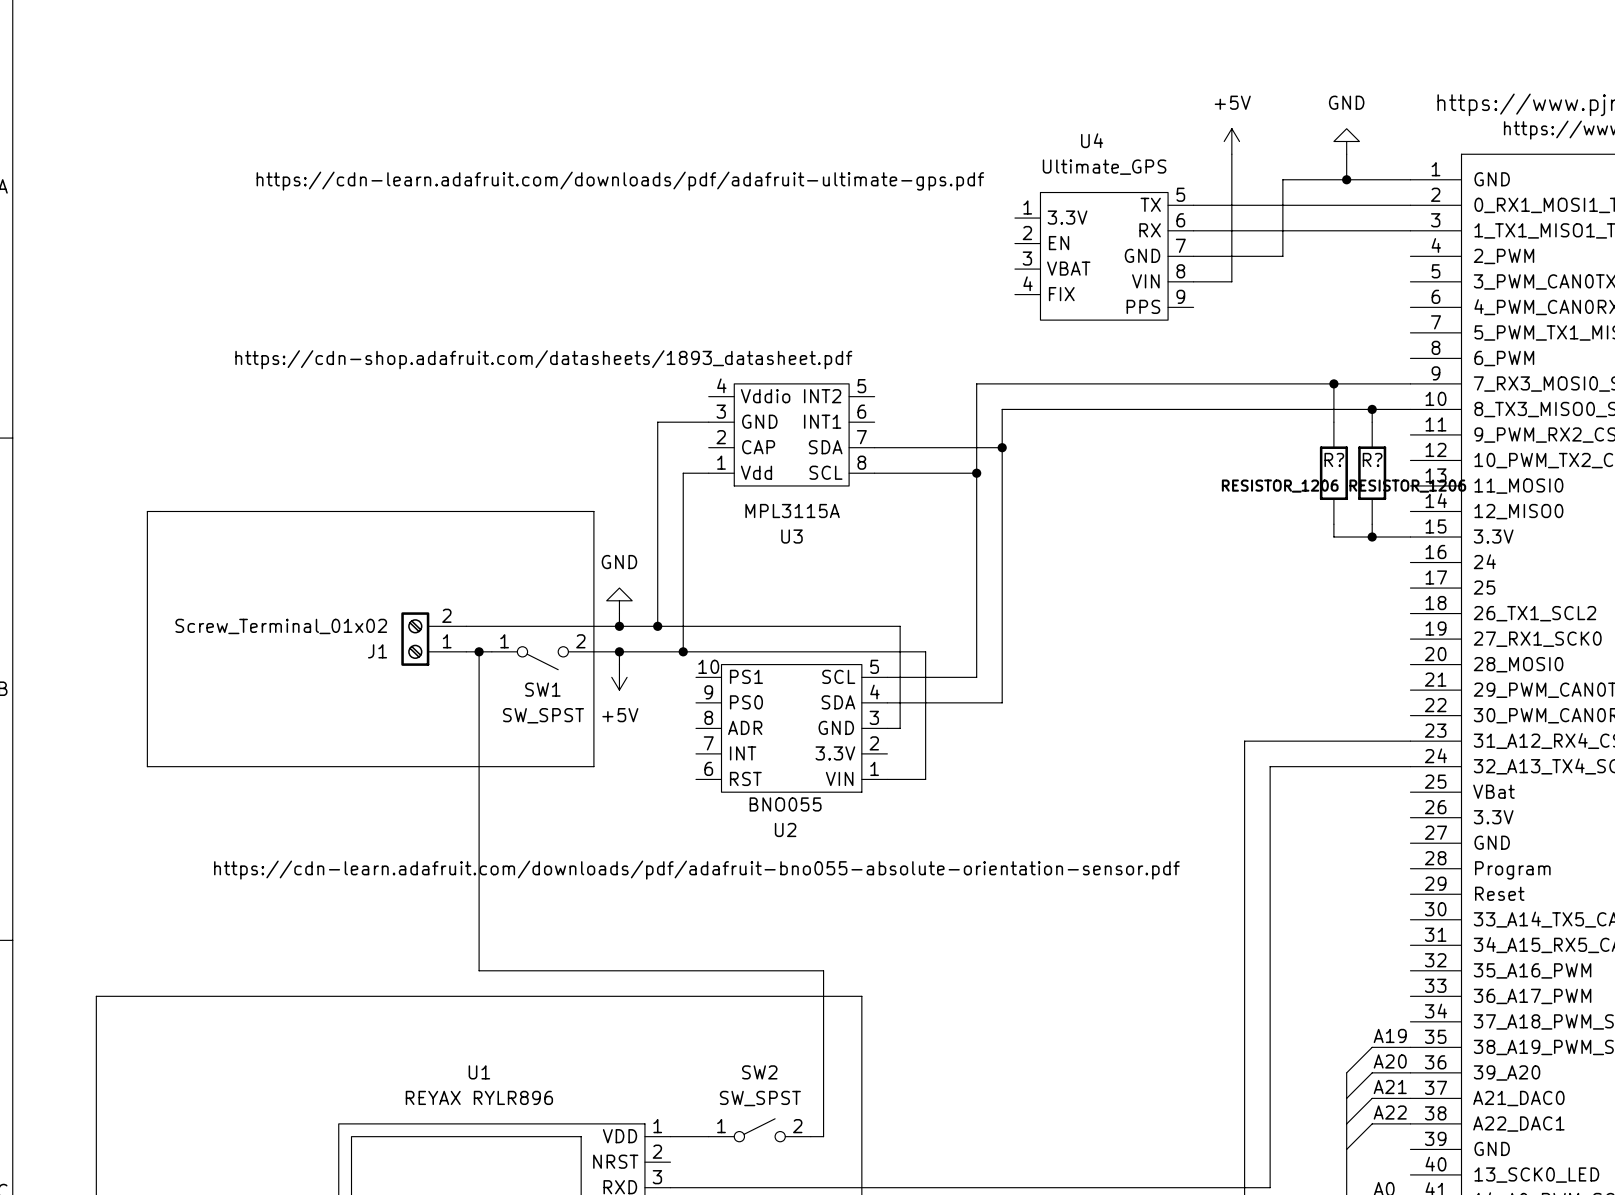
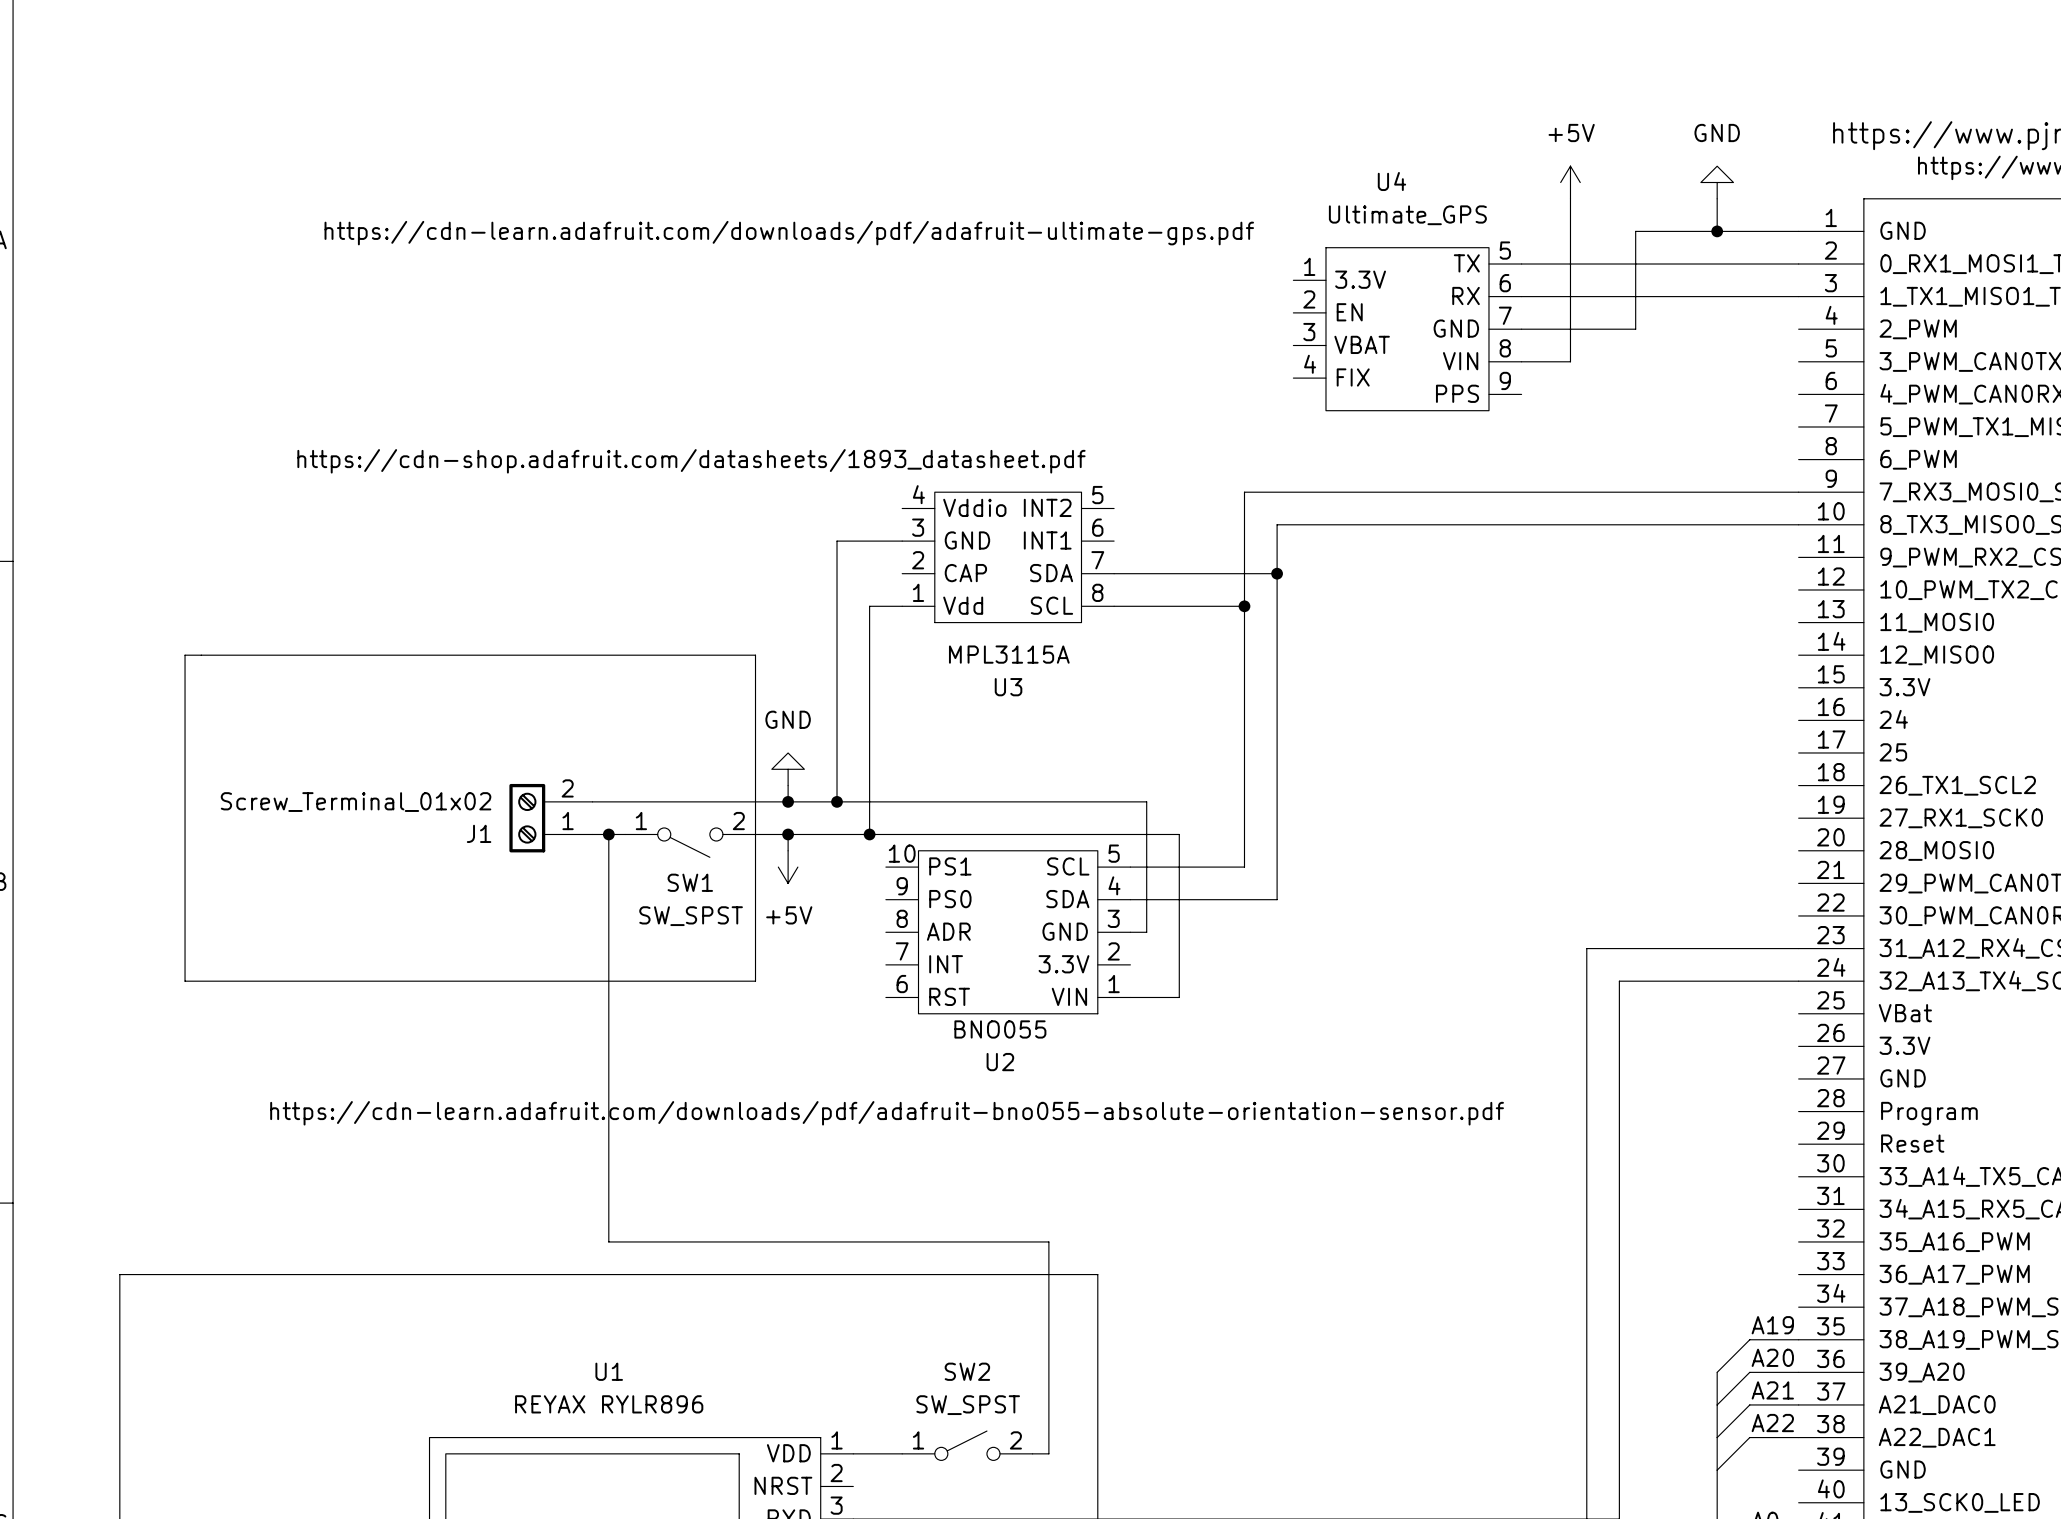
wire: (1333, 383) (1333, 422) -> none
junction: (1333, 383) -> none
wire: (1372, 409) (1372, 422) -> none
junction: (1372, 409) -> none
R?: RESISTOR_1206 (1333, 473) -> none
R?: RESISTOR_1206 (1372, 473) -> none
wire: (1333, 524) (1333, 537) (1410, 537) -> none
wire: (1372, 524) (1372, 537) -> none
junction: (1372, 537) -> none

